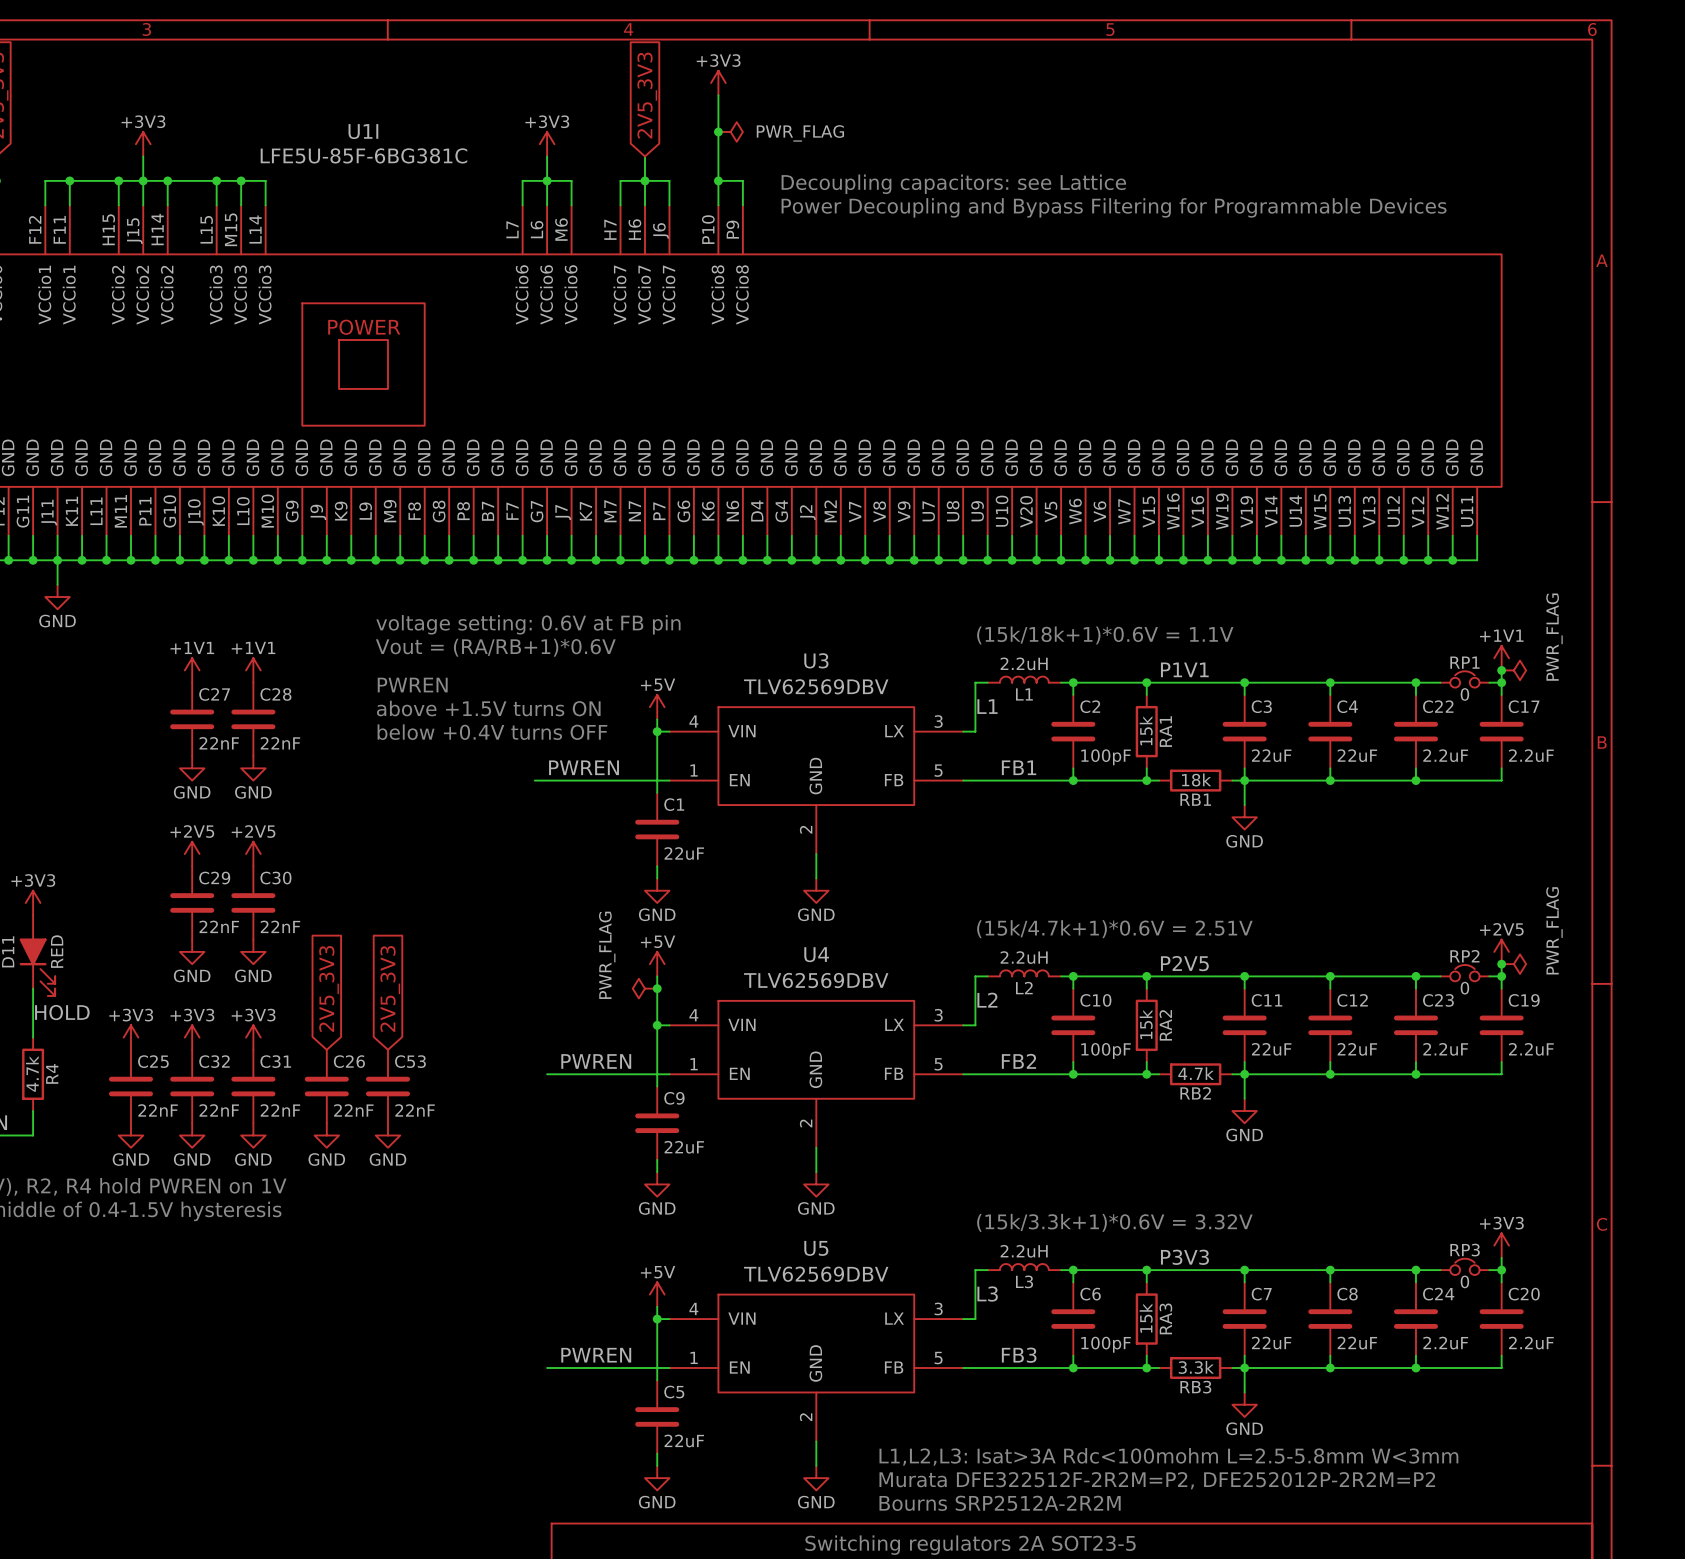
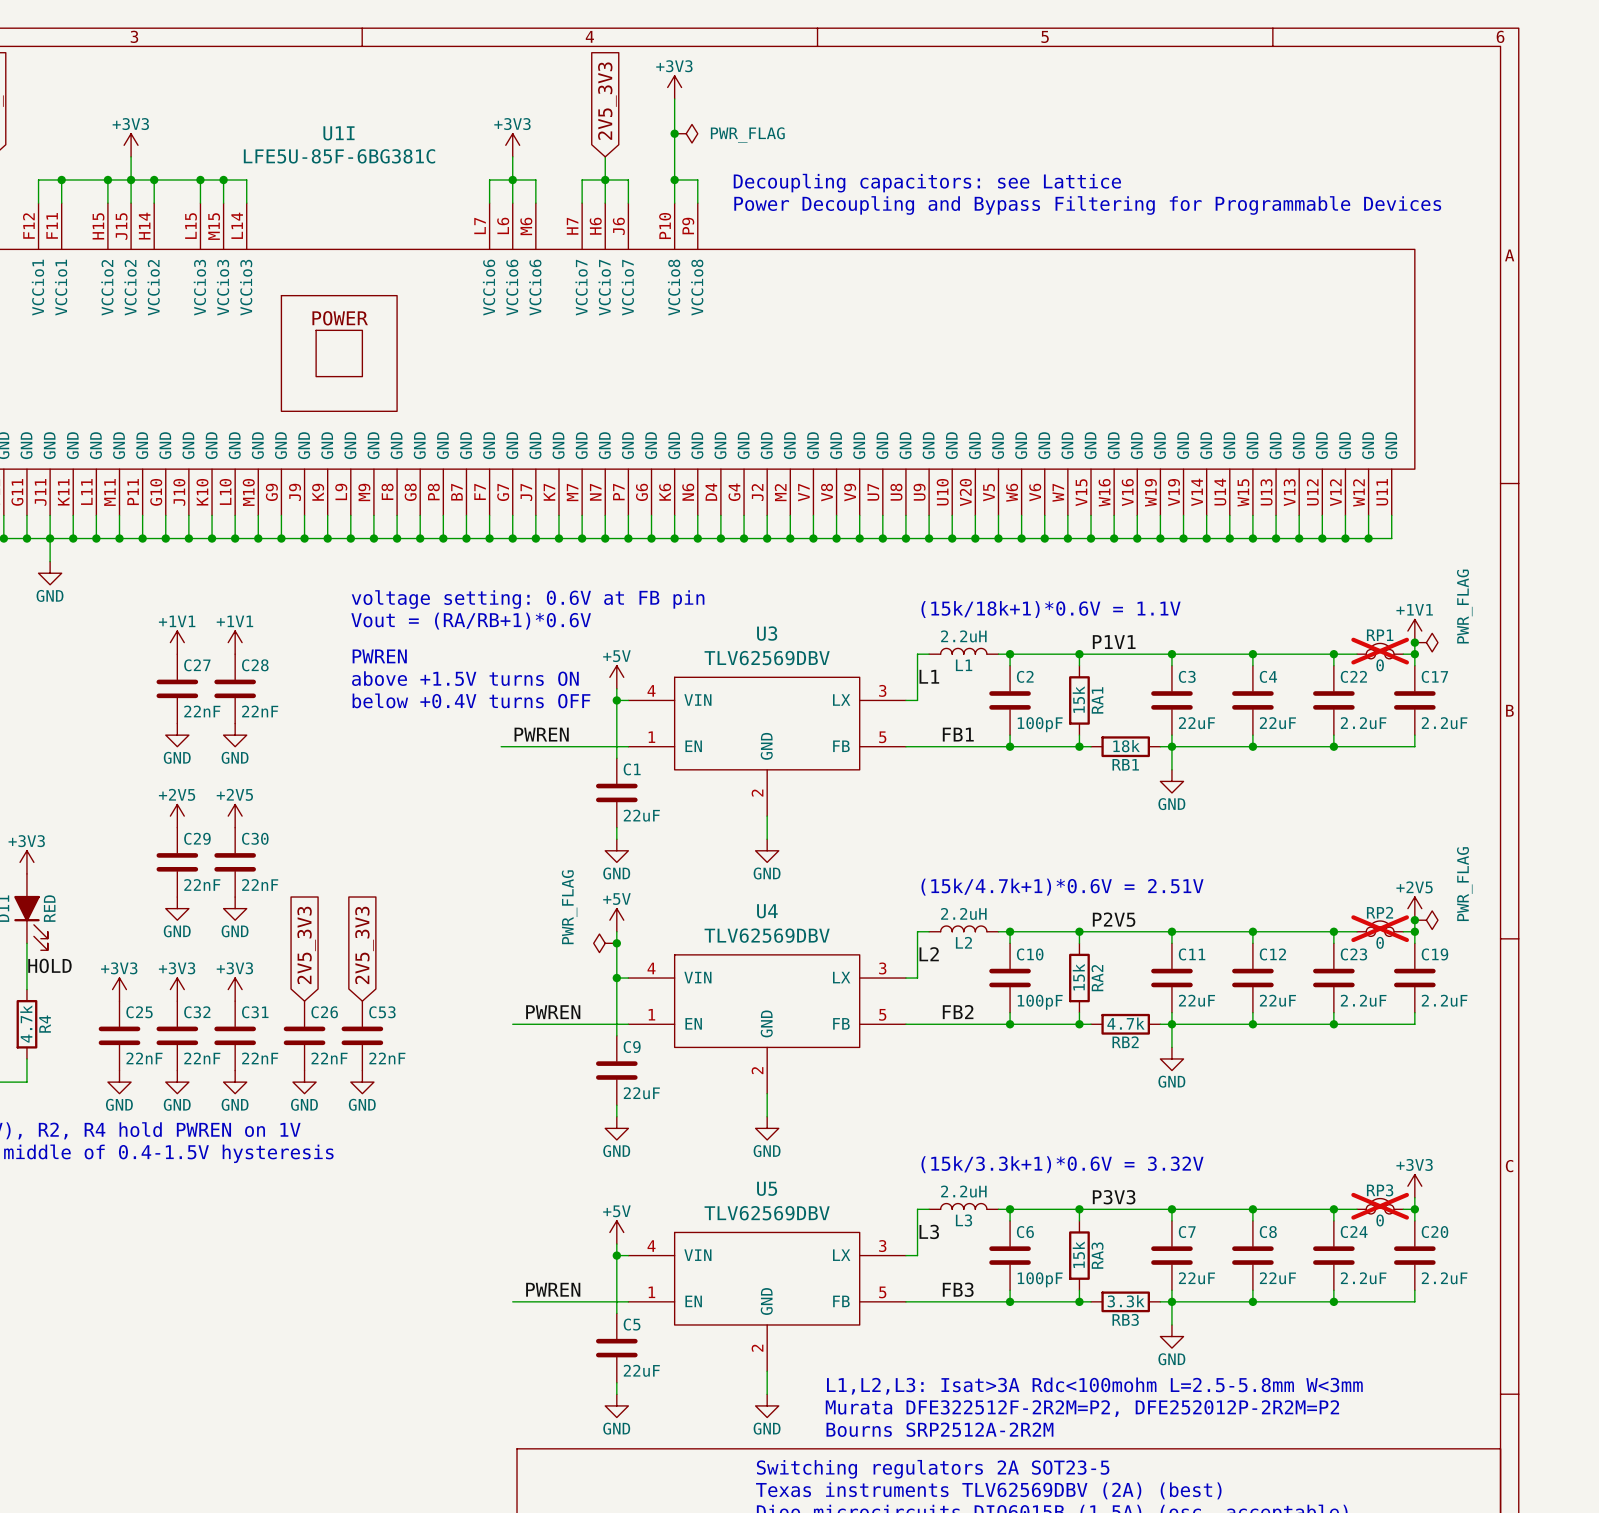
RP1 do-not-place cross: none -> (1380, 651)
RP2 do-not-place cross: none -> (1380, 928)
RP3 do-not-place cross: none -> (1380, 1206)

